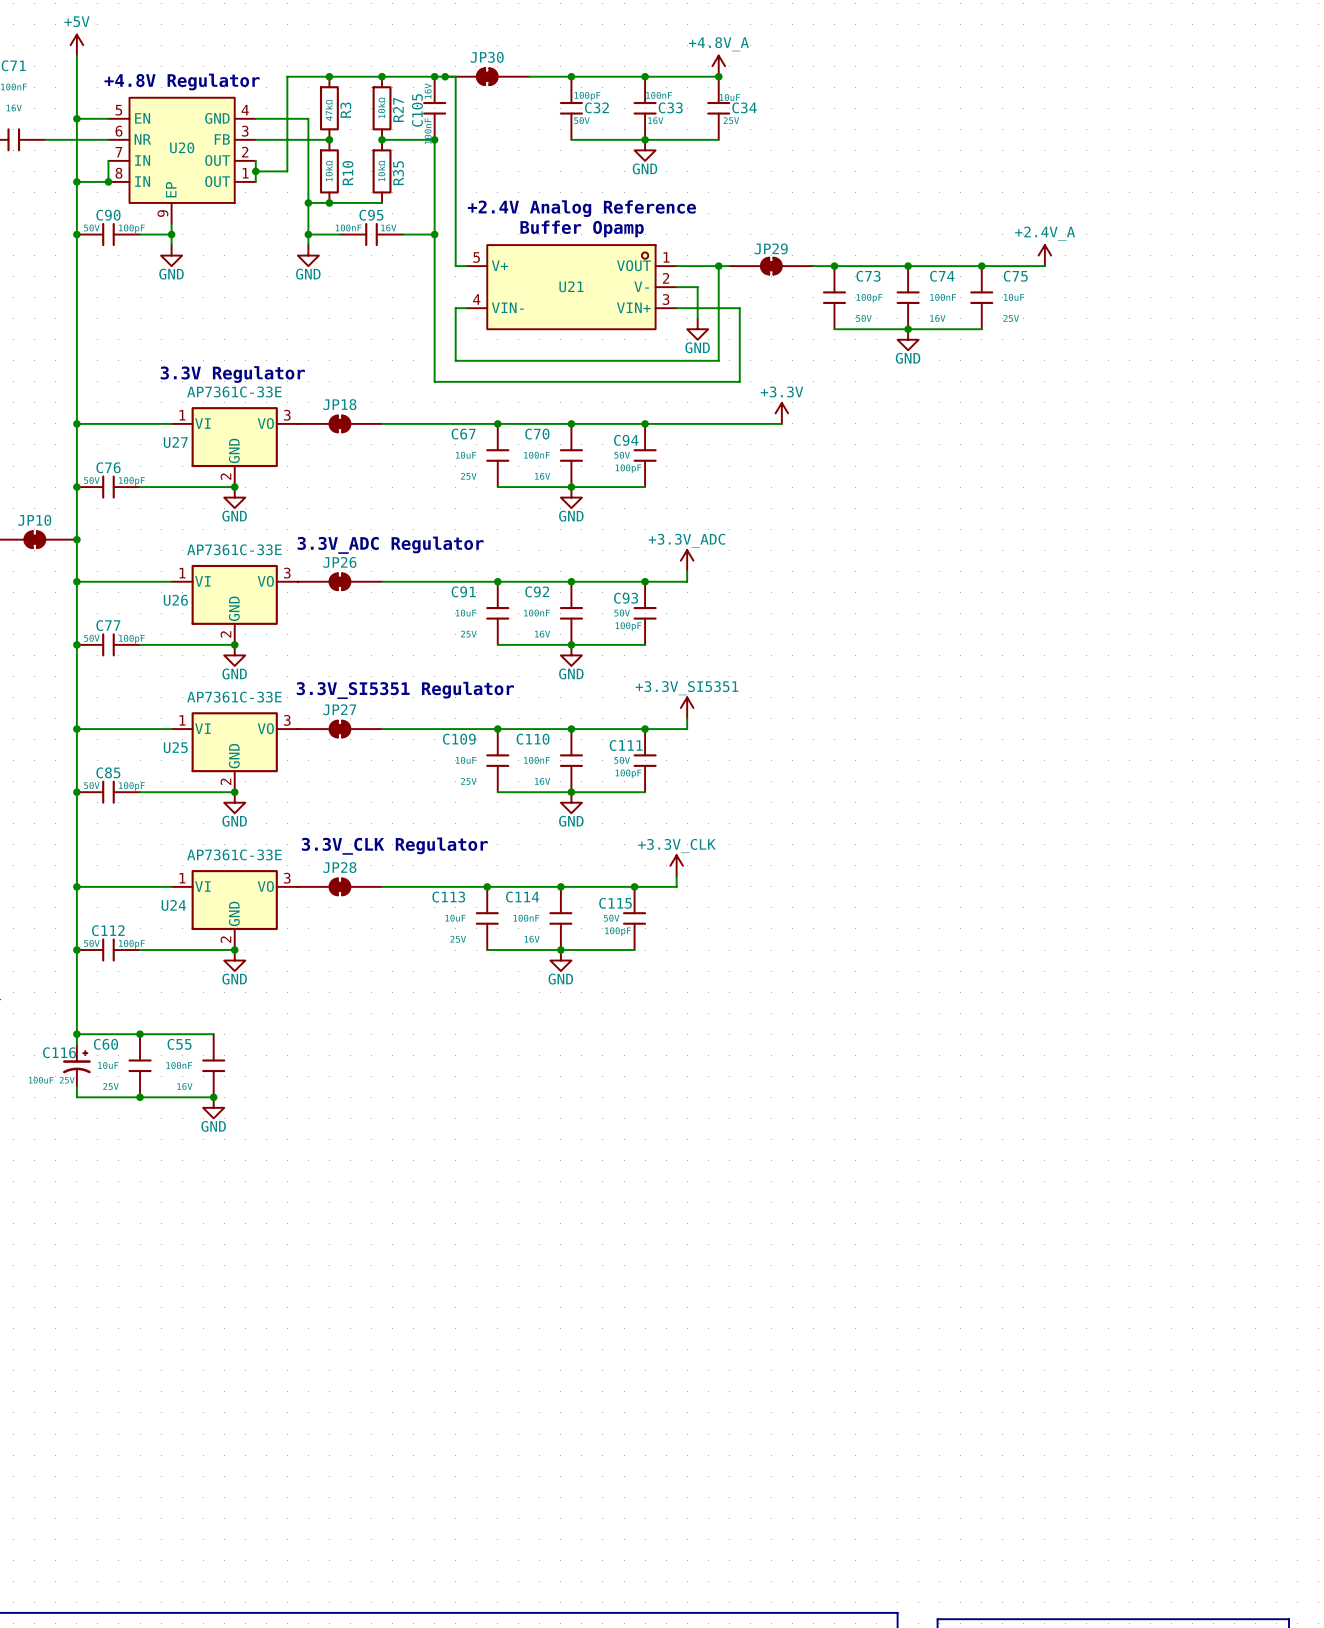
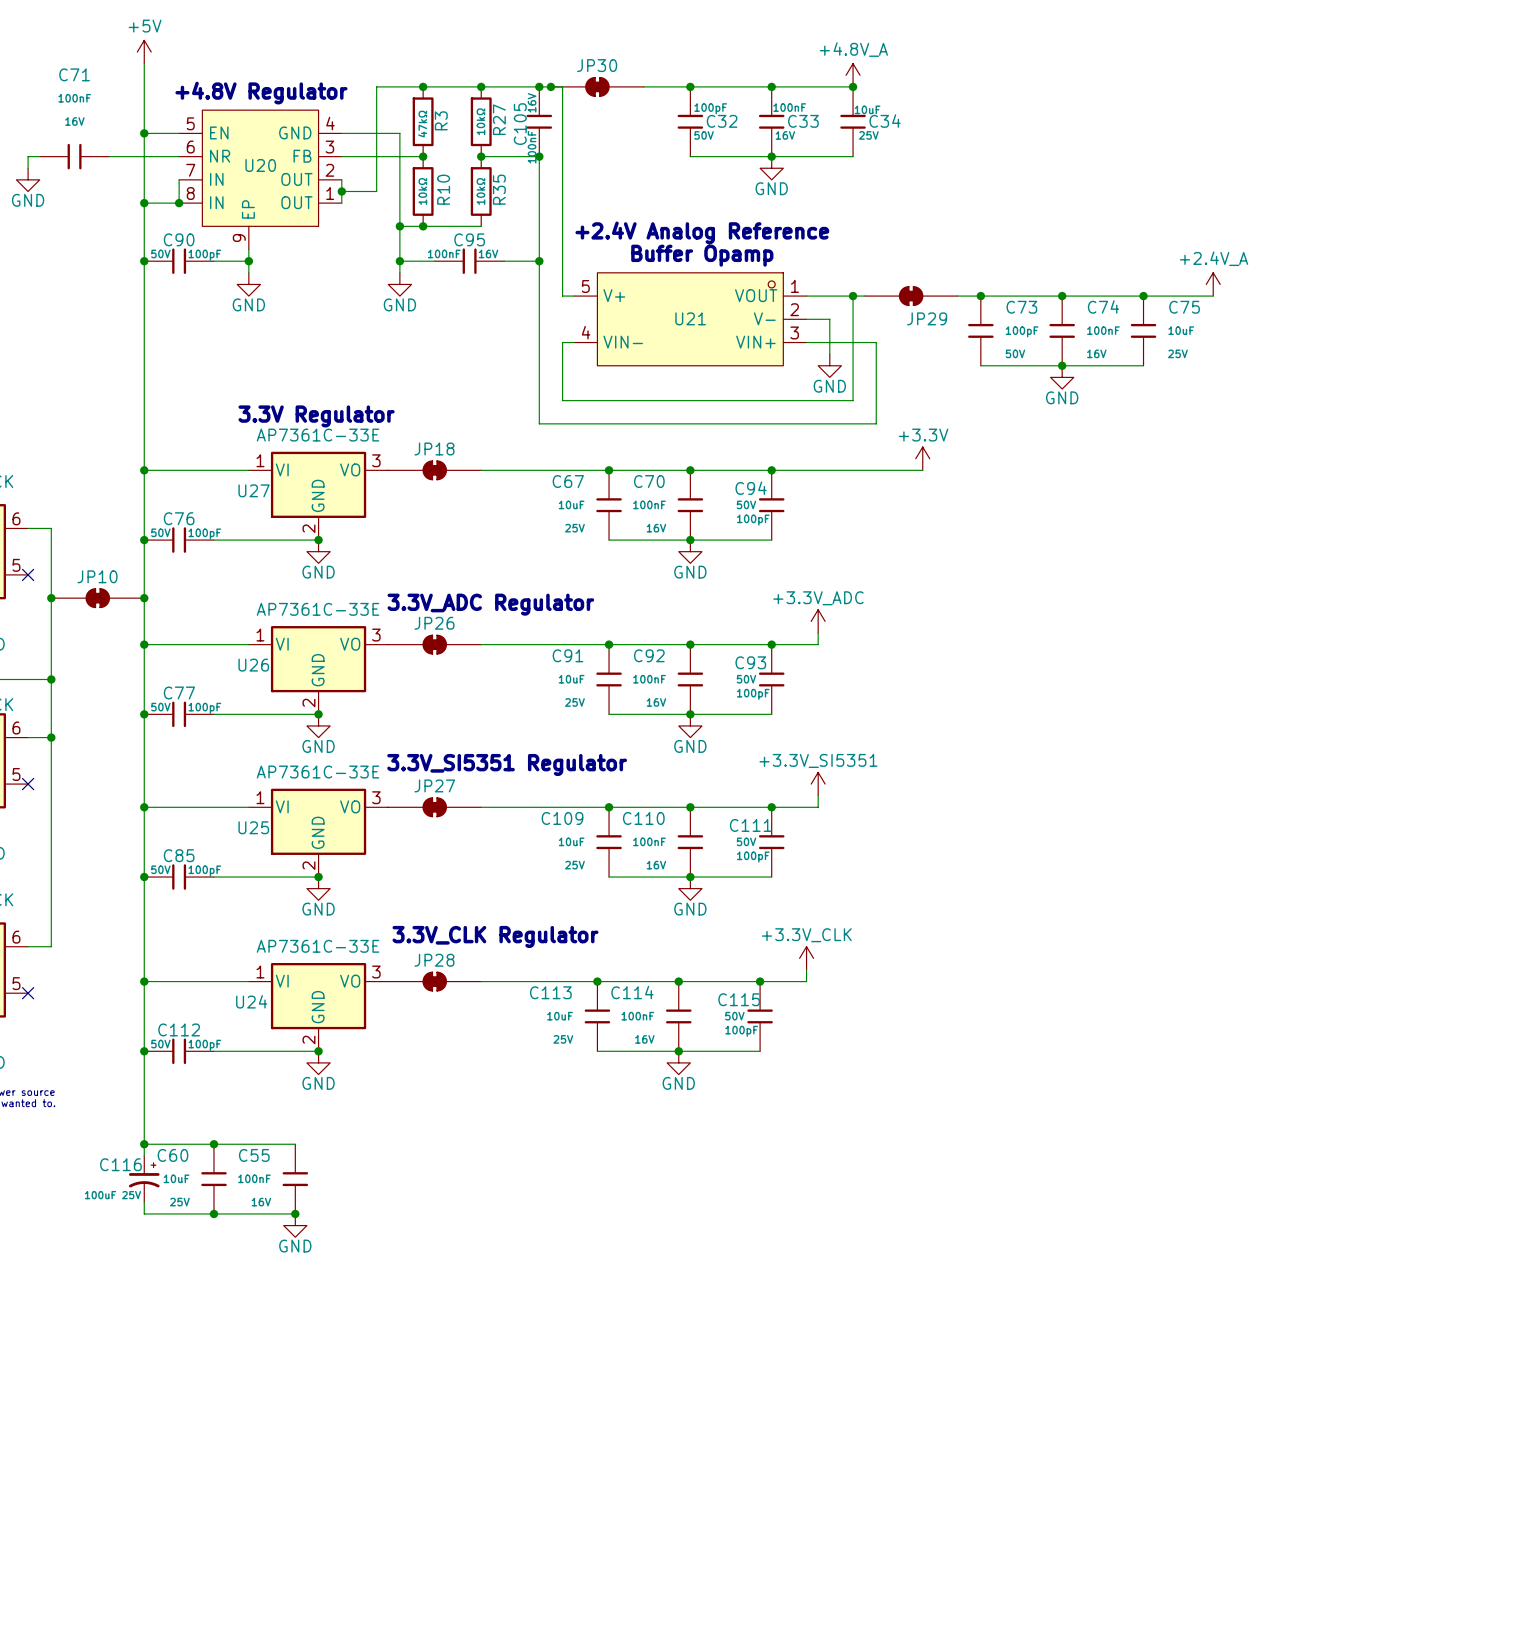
JP29 name position: JP29 (771, 248) -> JP29 (927, 318)

